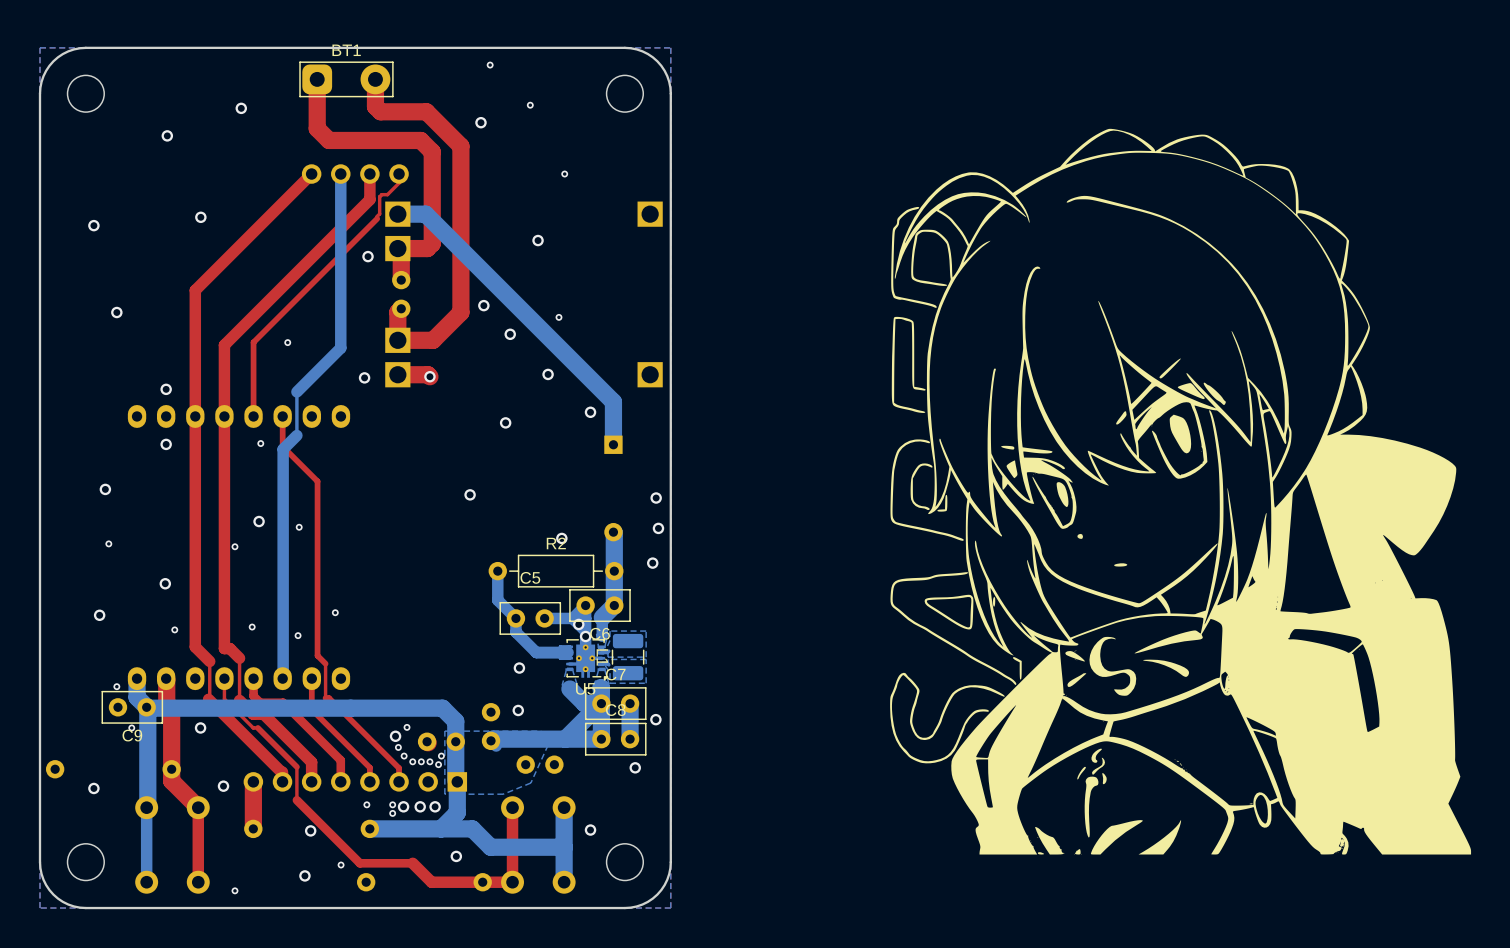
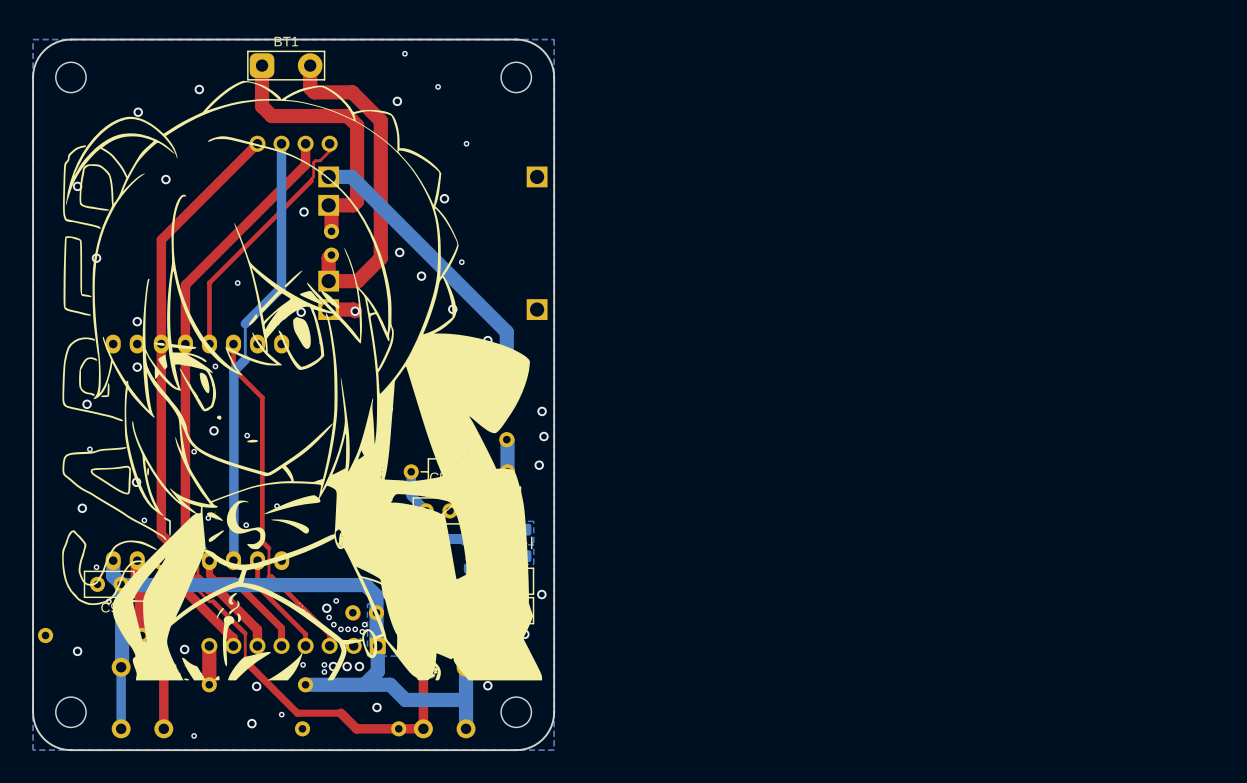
drawing: none -> [62, 80, 543, 681]
drawing: [890, 128, 1472, 855] -> none

